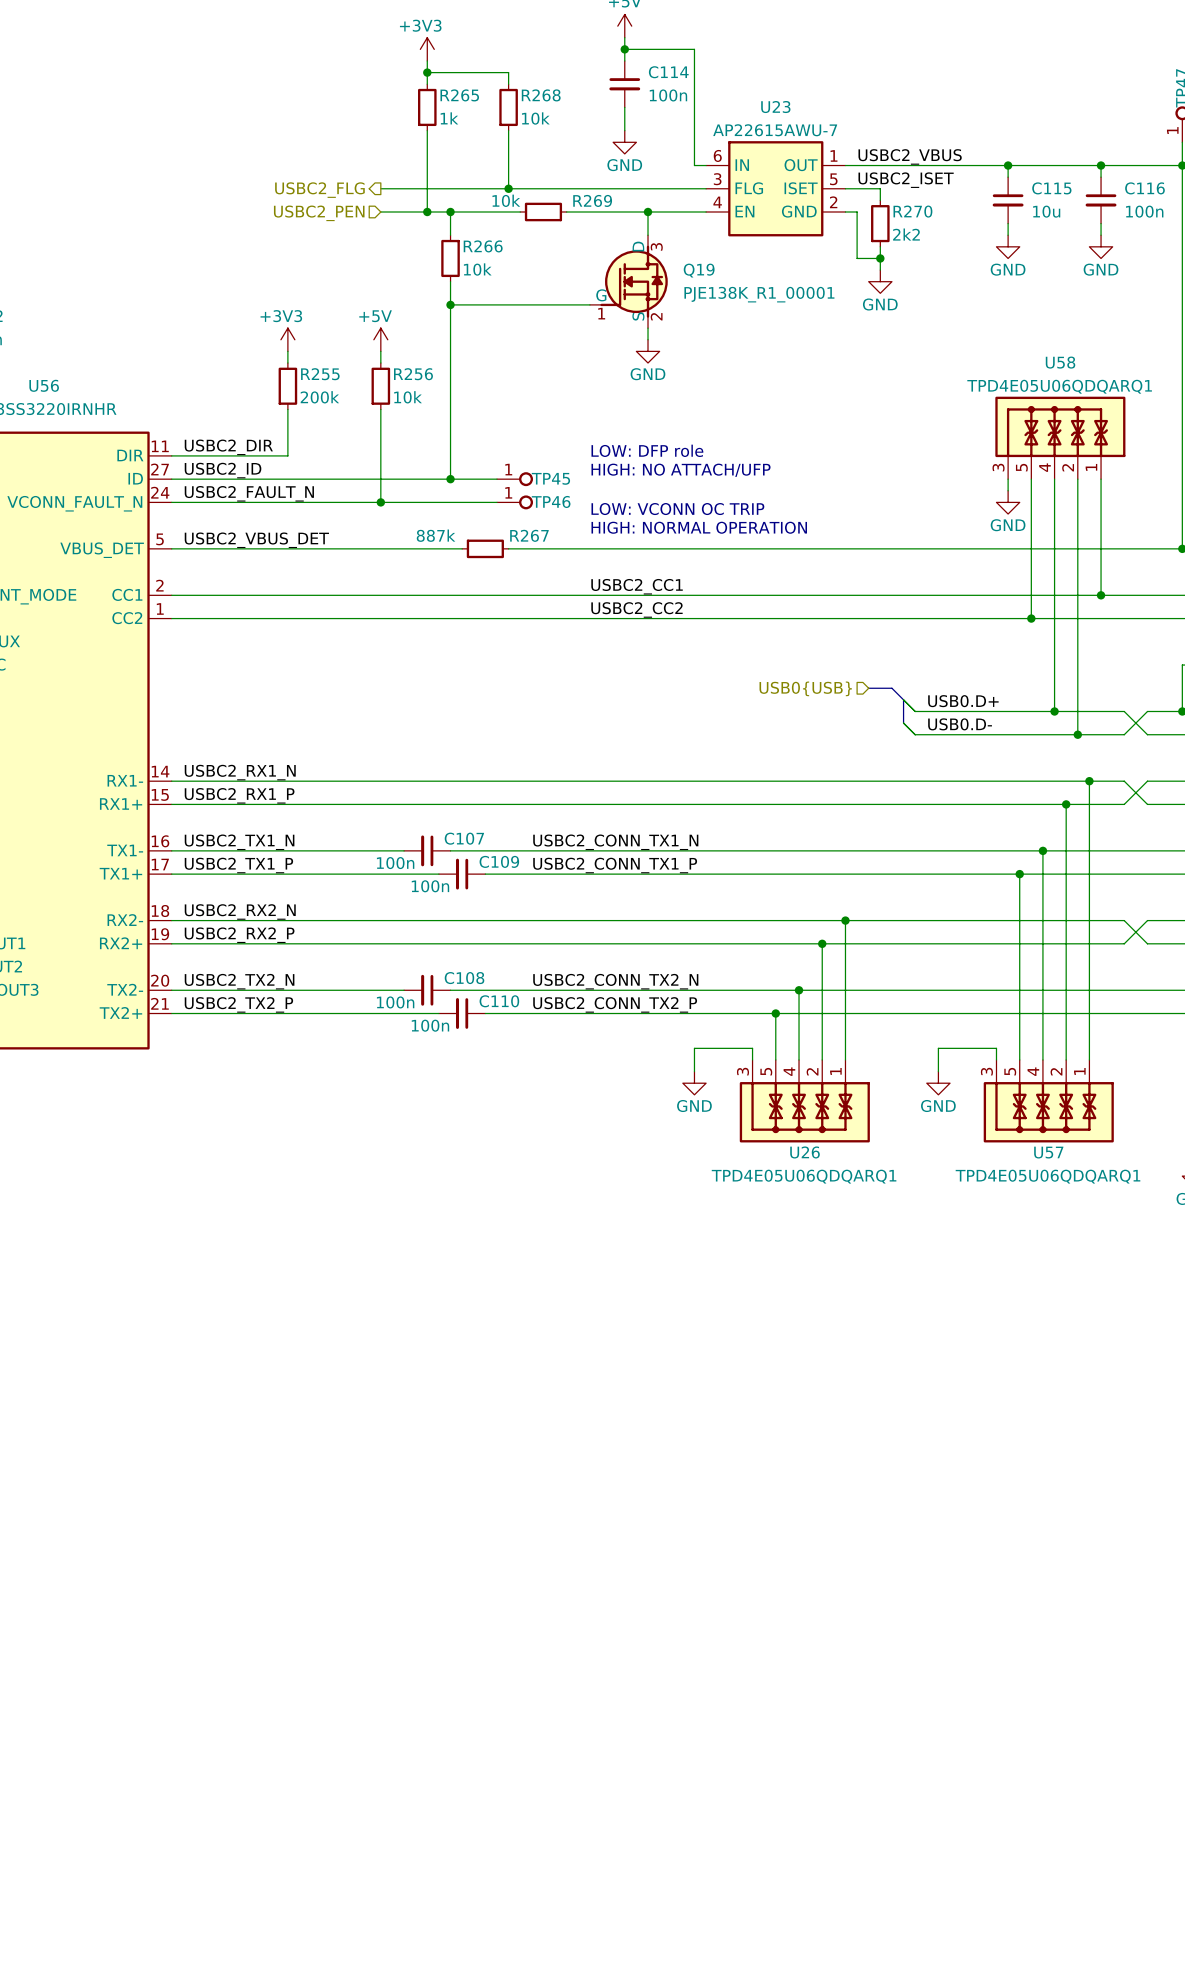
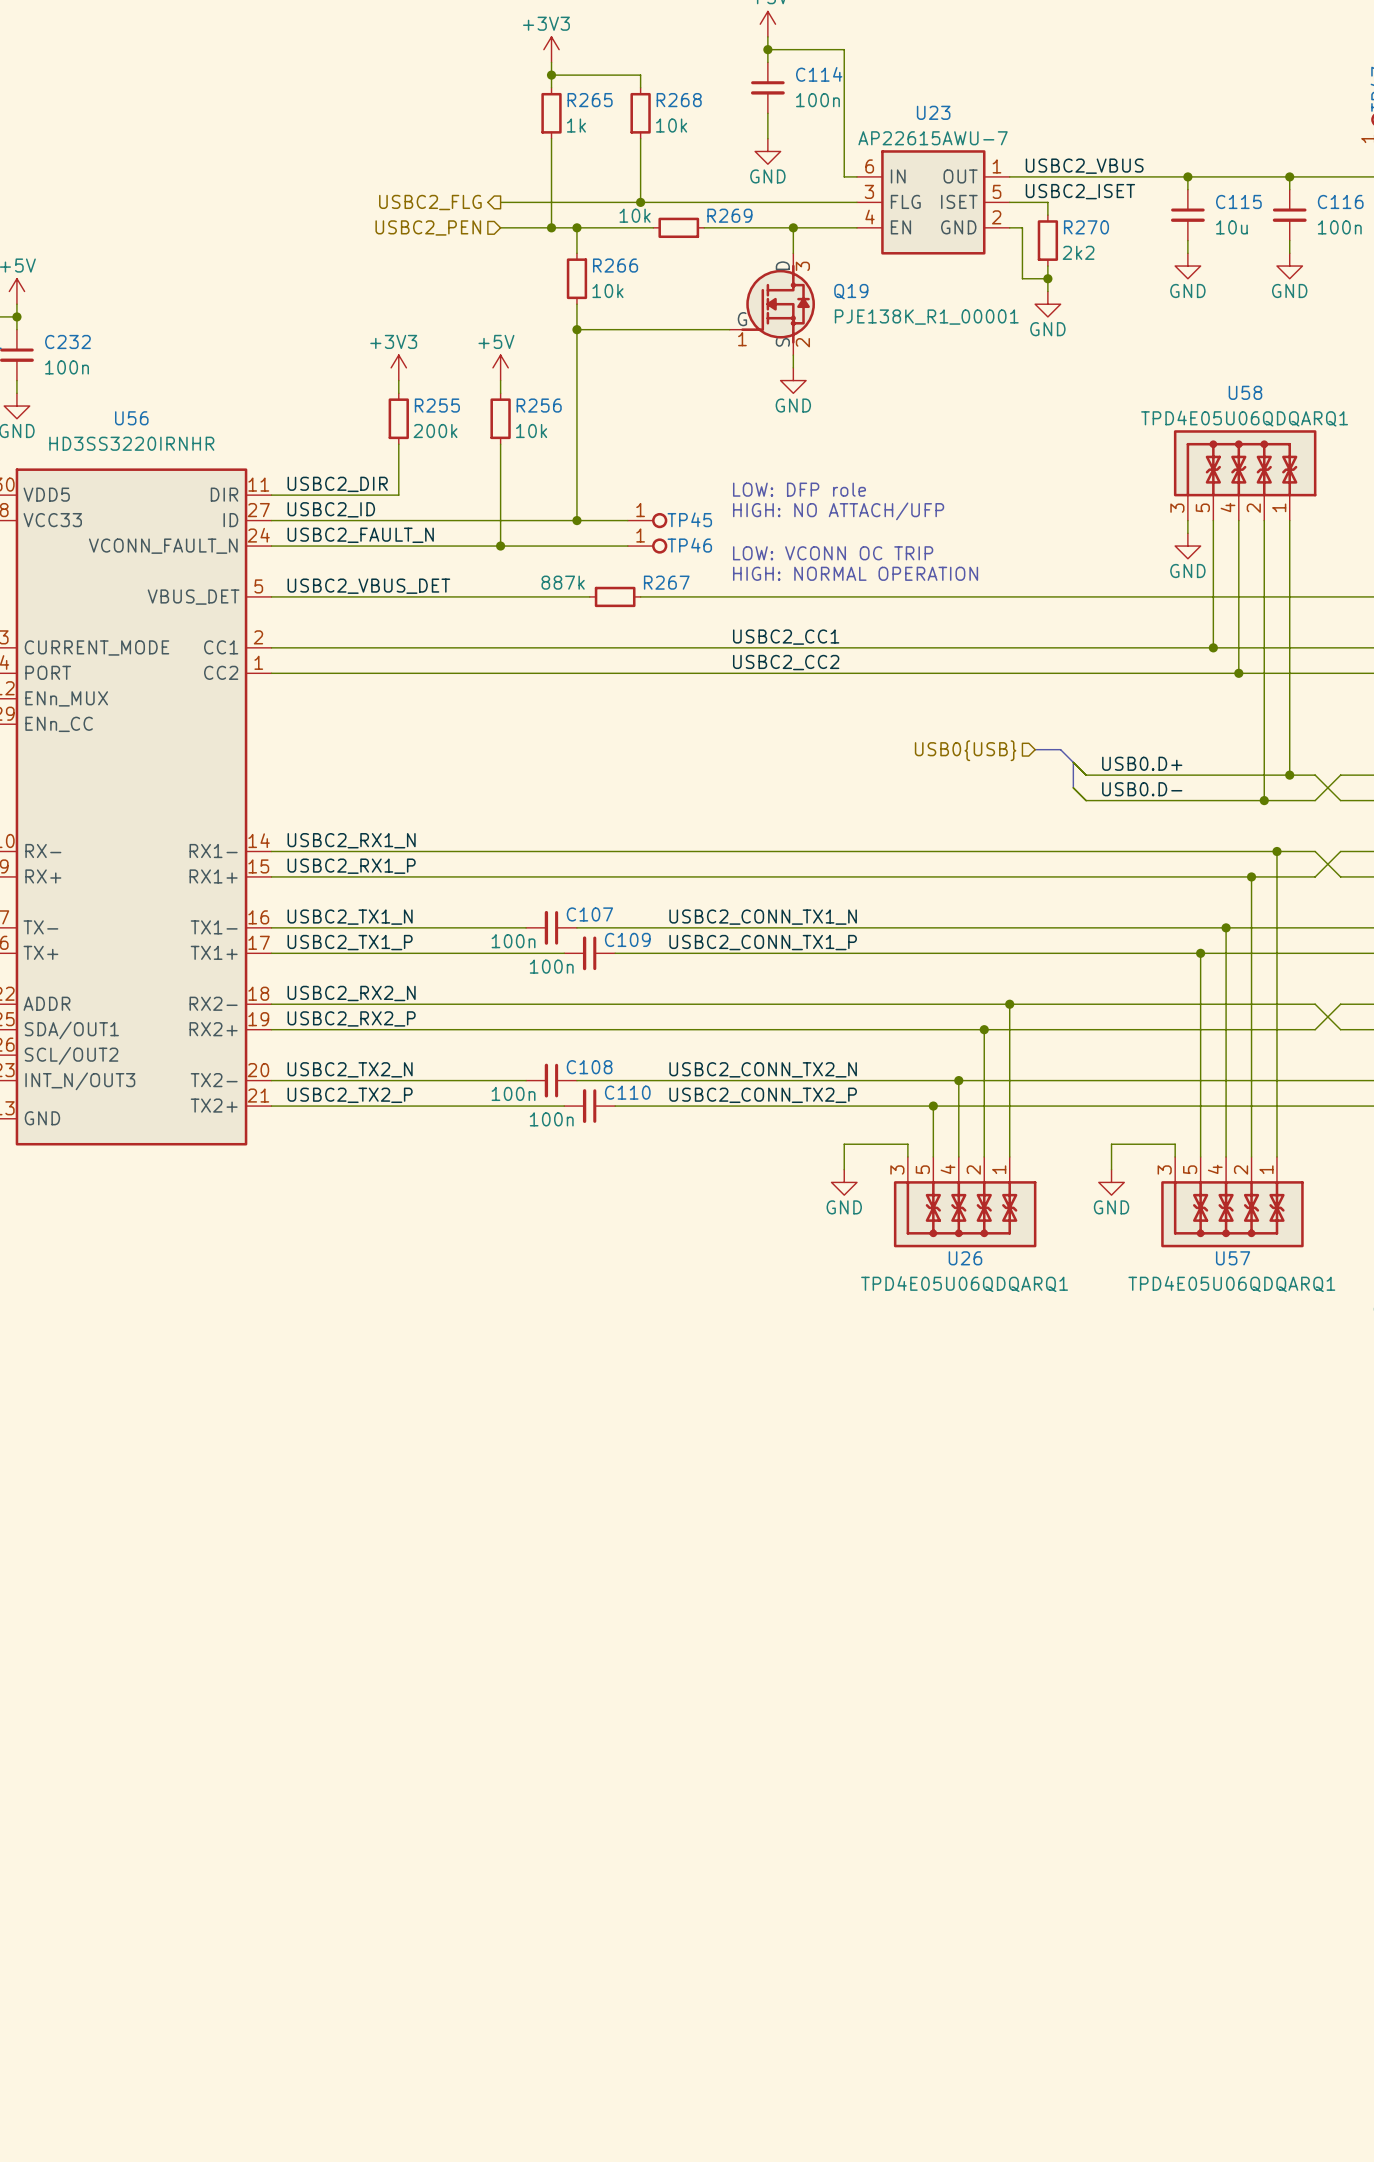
wire: (1031, 595) (1031, 618) -> none
junction: none -> (1213, 647)
wire: none -> (1289, 647) (1289, 775)
junction: (1101, 595) -> none
junction: (1031, 618) -> none
wire: (1054, 618) (1054, 711) -> none
junction: none -> (1238, 673)
junction: (1054, 711) -> none
junction: none -> (1289, 775)

